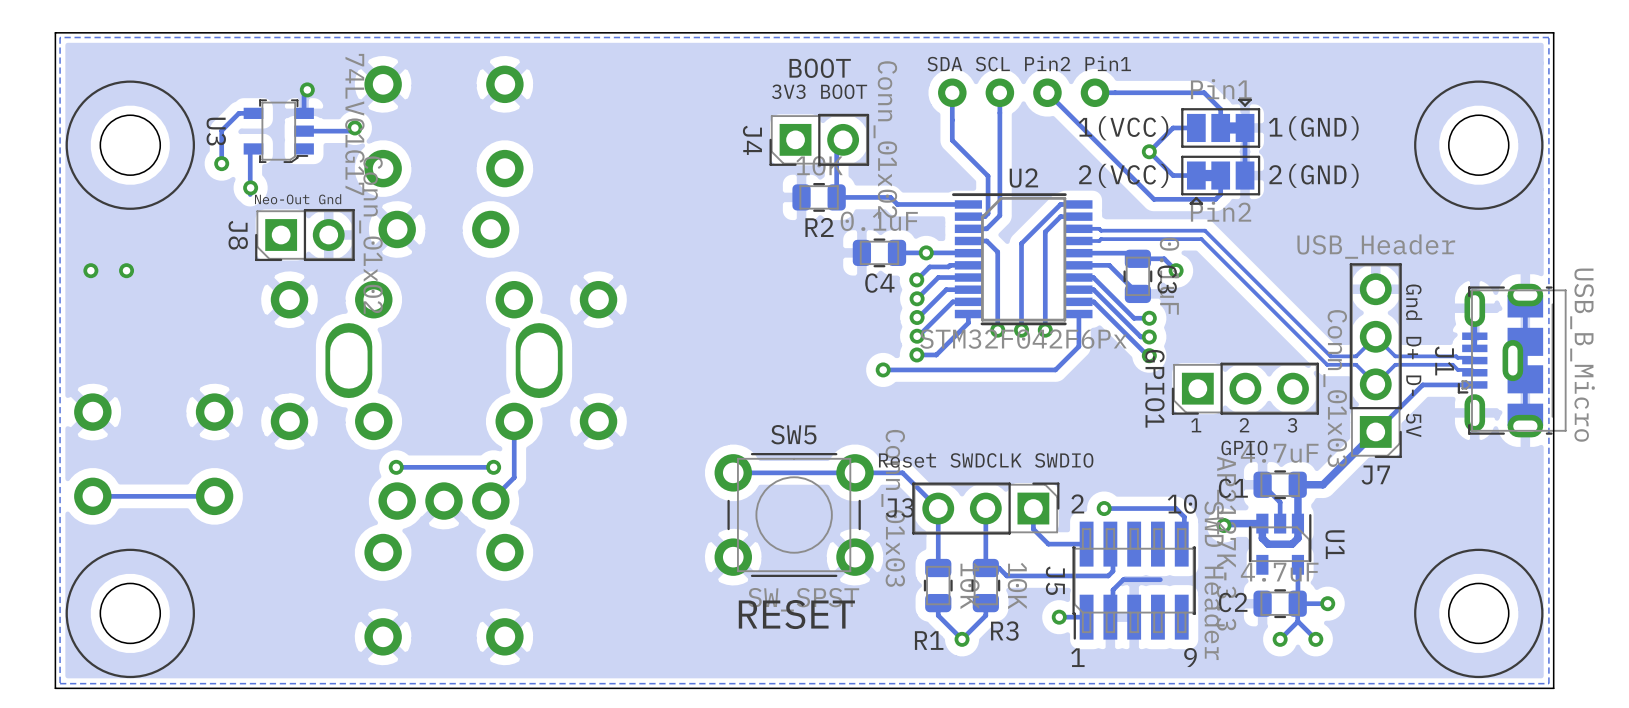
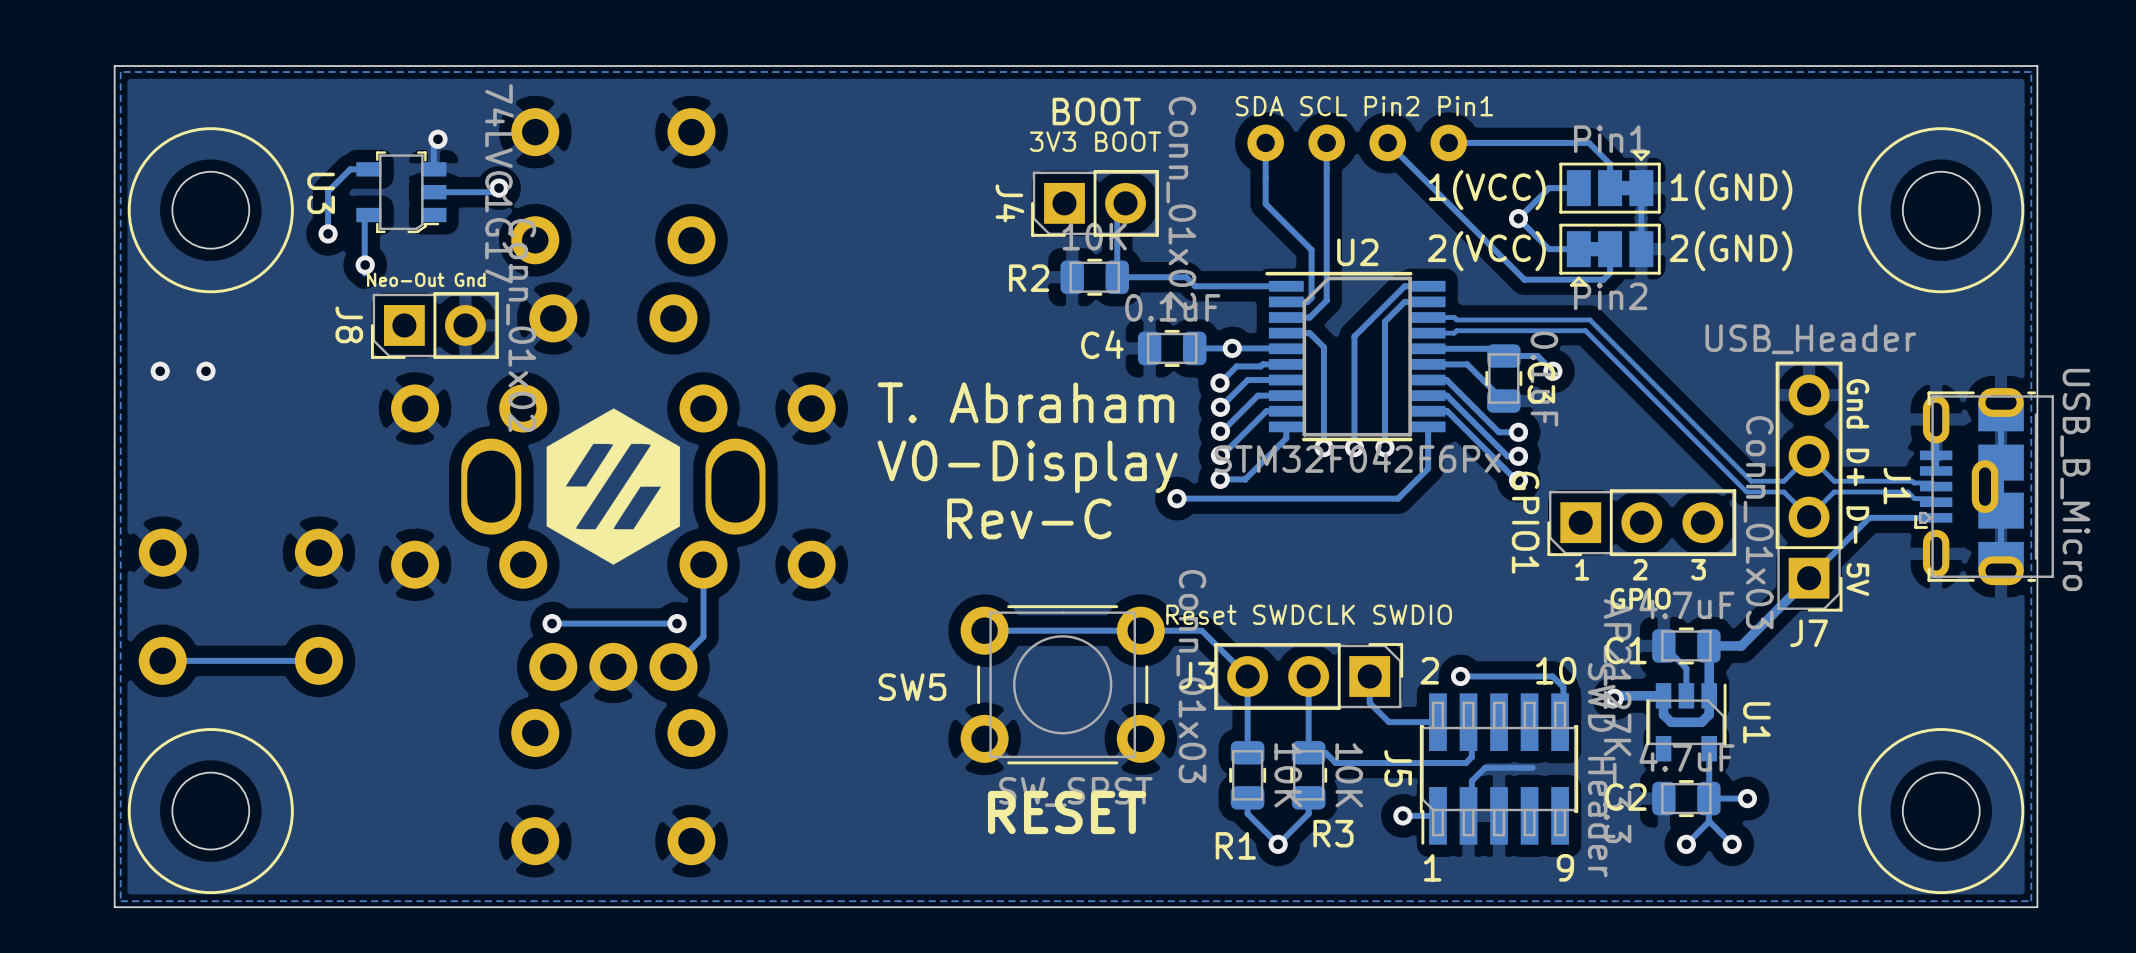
R2 name position: R2 (819, 227) -> R2 (1029, 278)
C4 name position: C4 (879, 283) -> C4 (1102, 344)
text: none -> T. Abraham (1025, 402)
drawing: none -> [546, 408, 681, 565]
text: none -> V0-Display (1027, 466)
text: none -> Rev-C (1029, 518)
SW5 name position: SW5 (793, 434) -> SW5 (912, 687)

